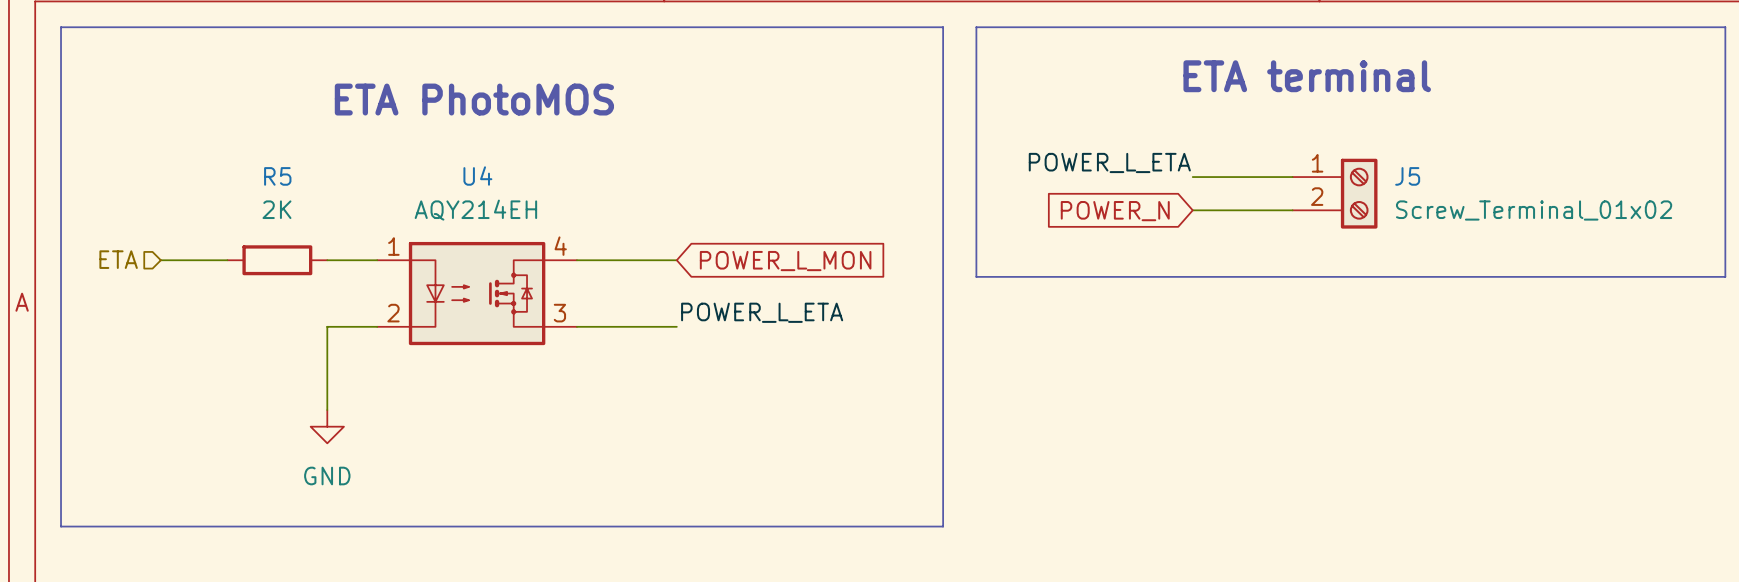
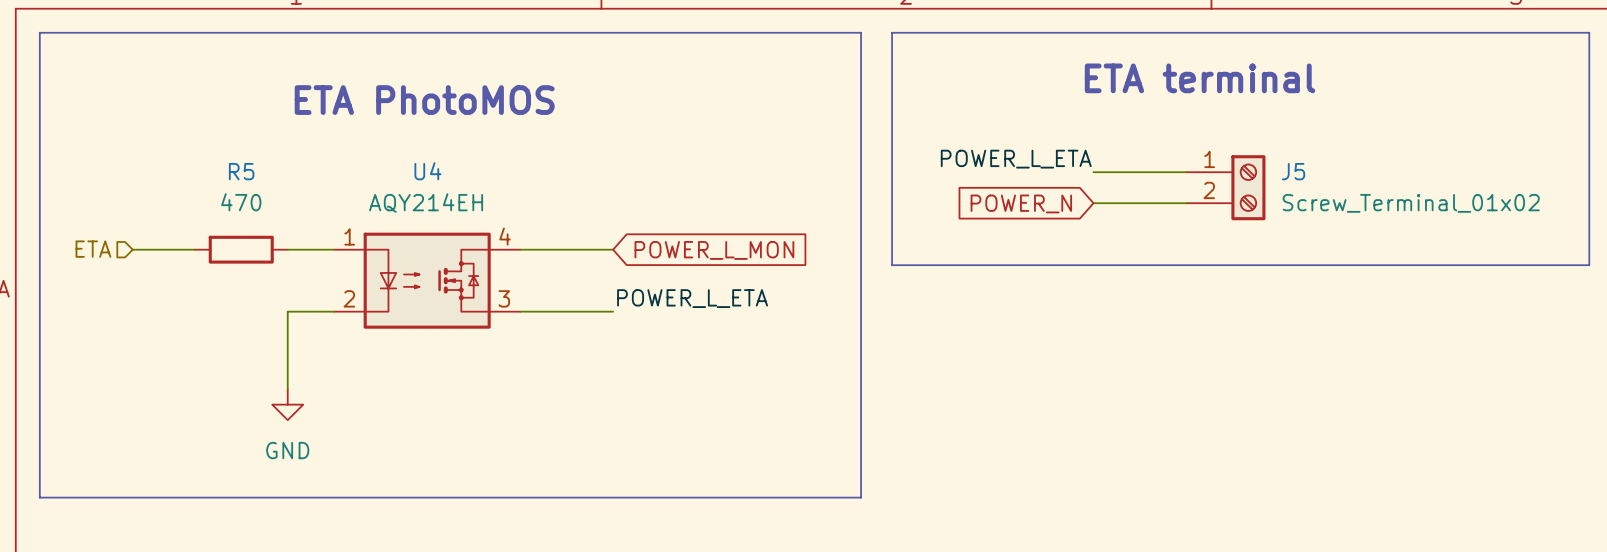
R5 value: 2K (276, 209) -> 470 (241, 202)

